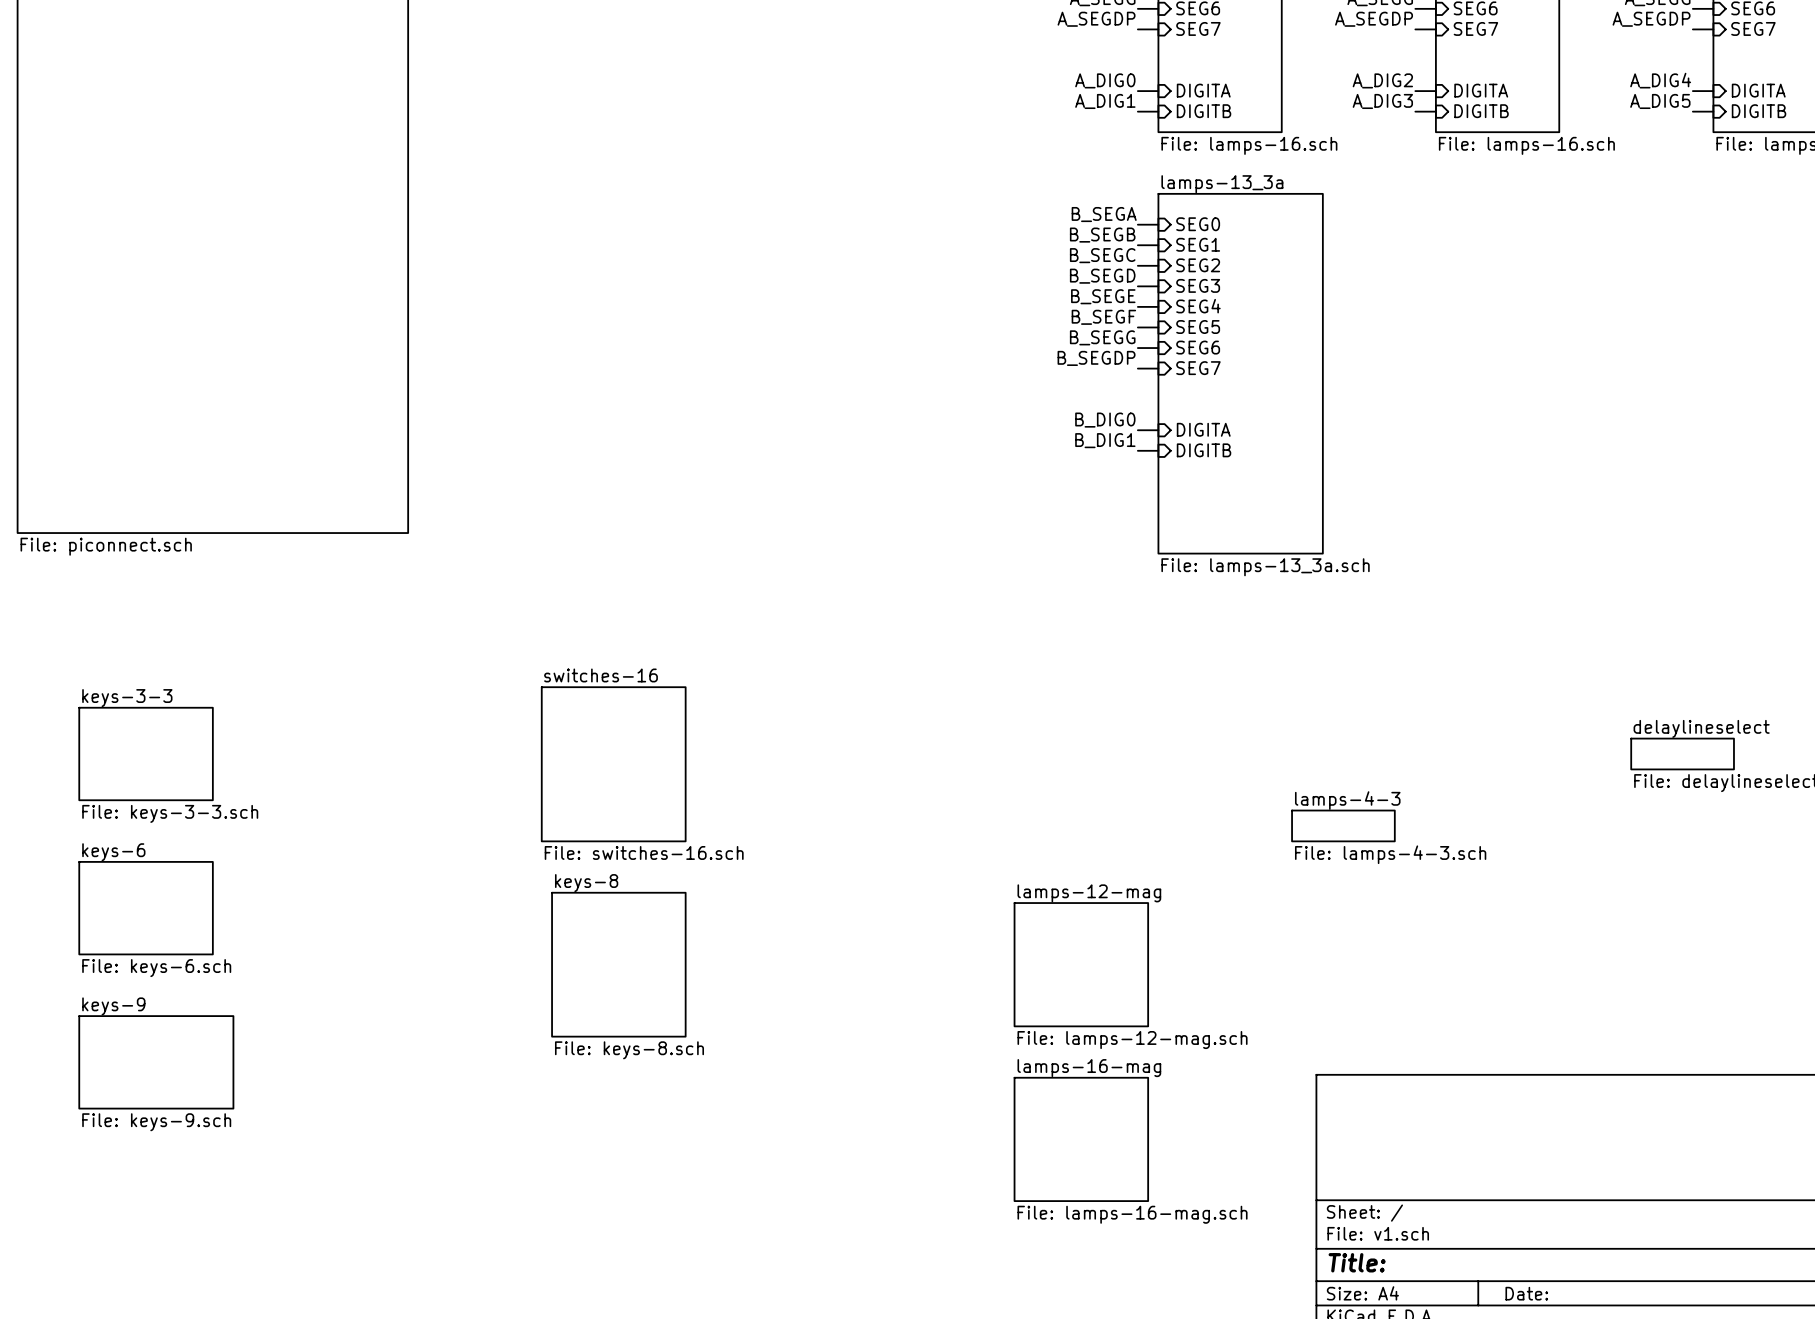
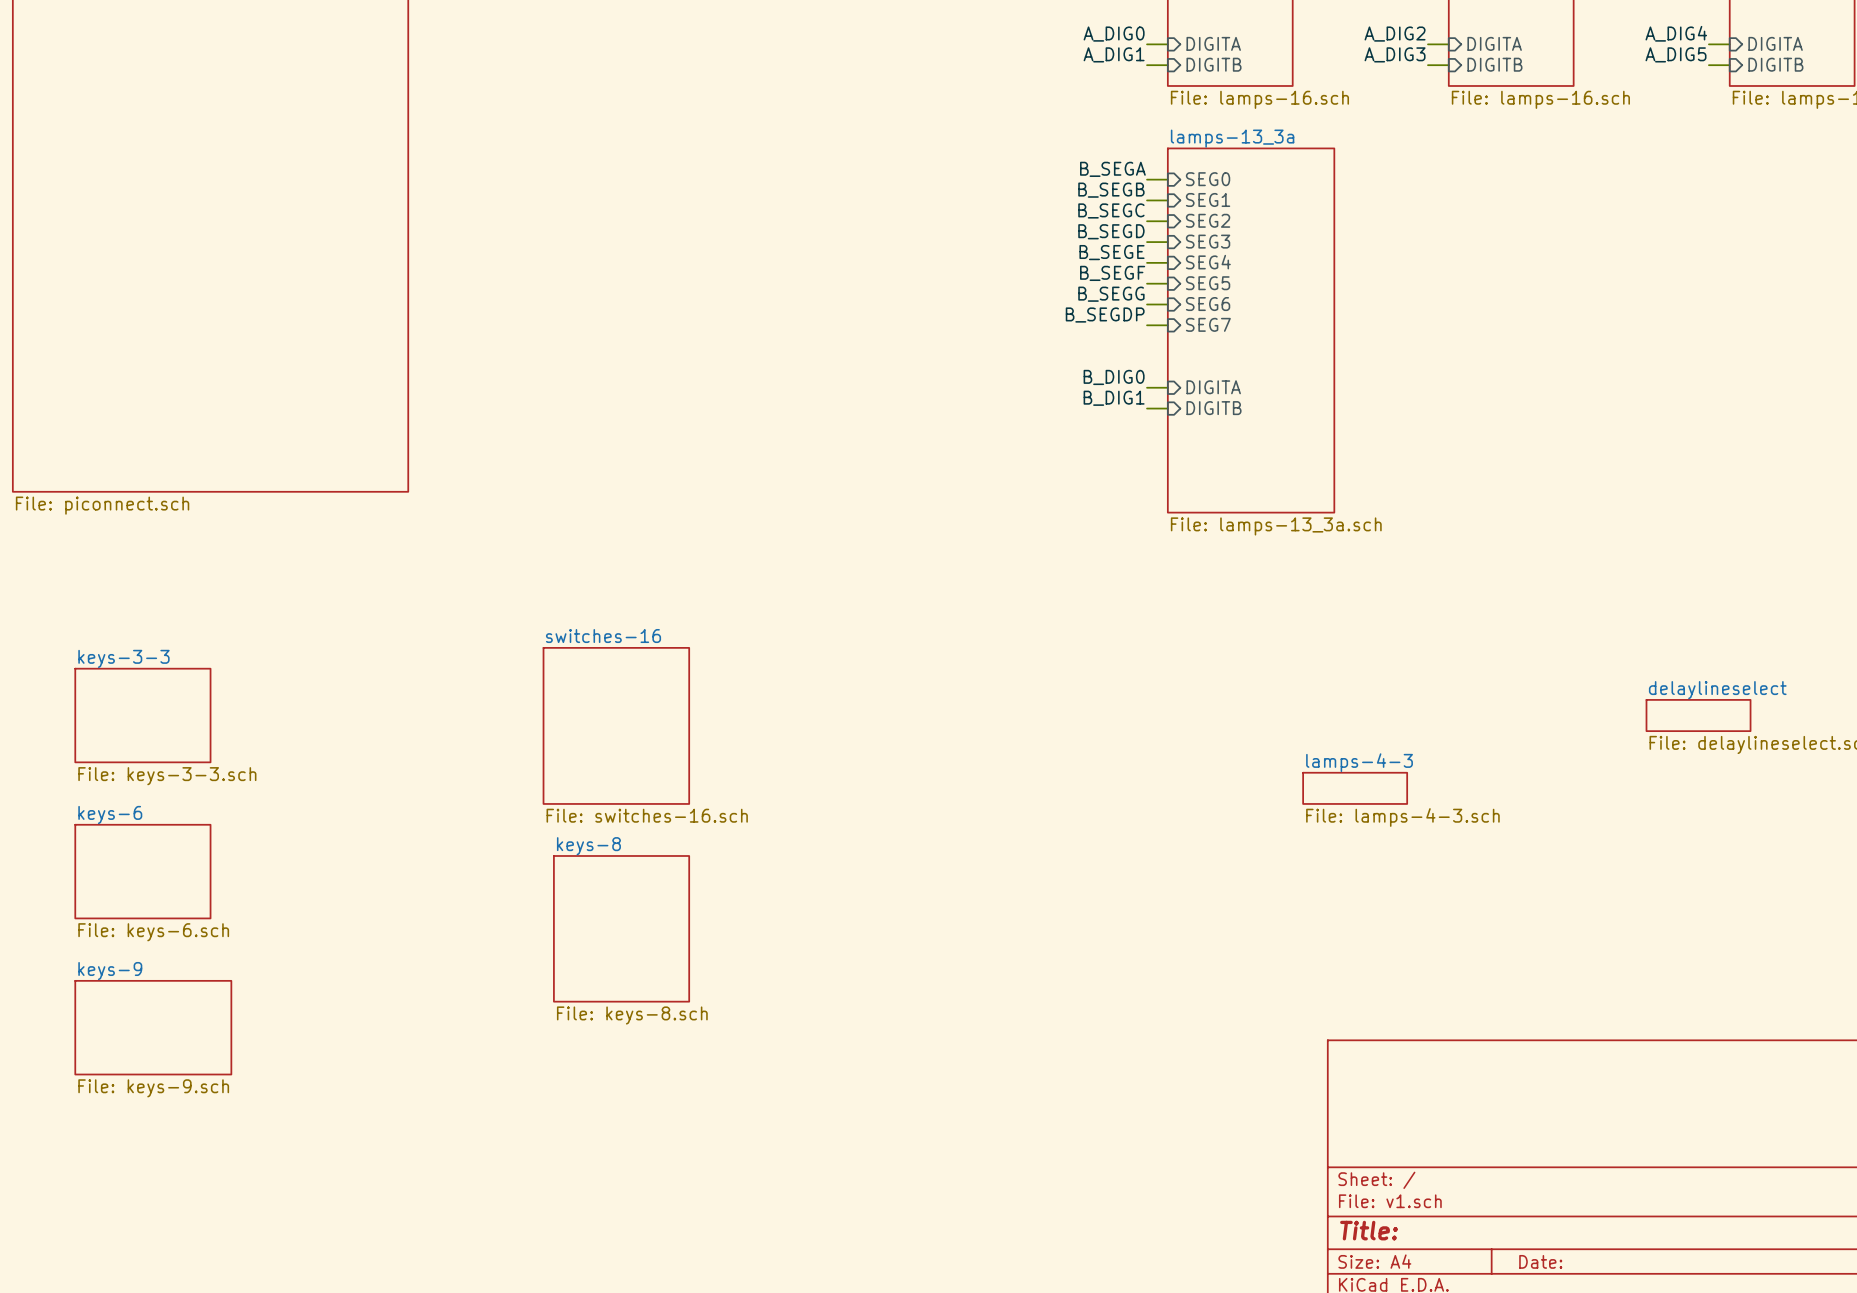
sheet lamps-12-mag: File: lamps-12-mag.sch (1081, 964) -> none
sheet lamps-16-mag: File: lamps-16-mag.sch (1081, 1139) -> none

